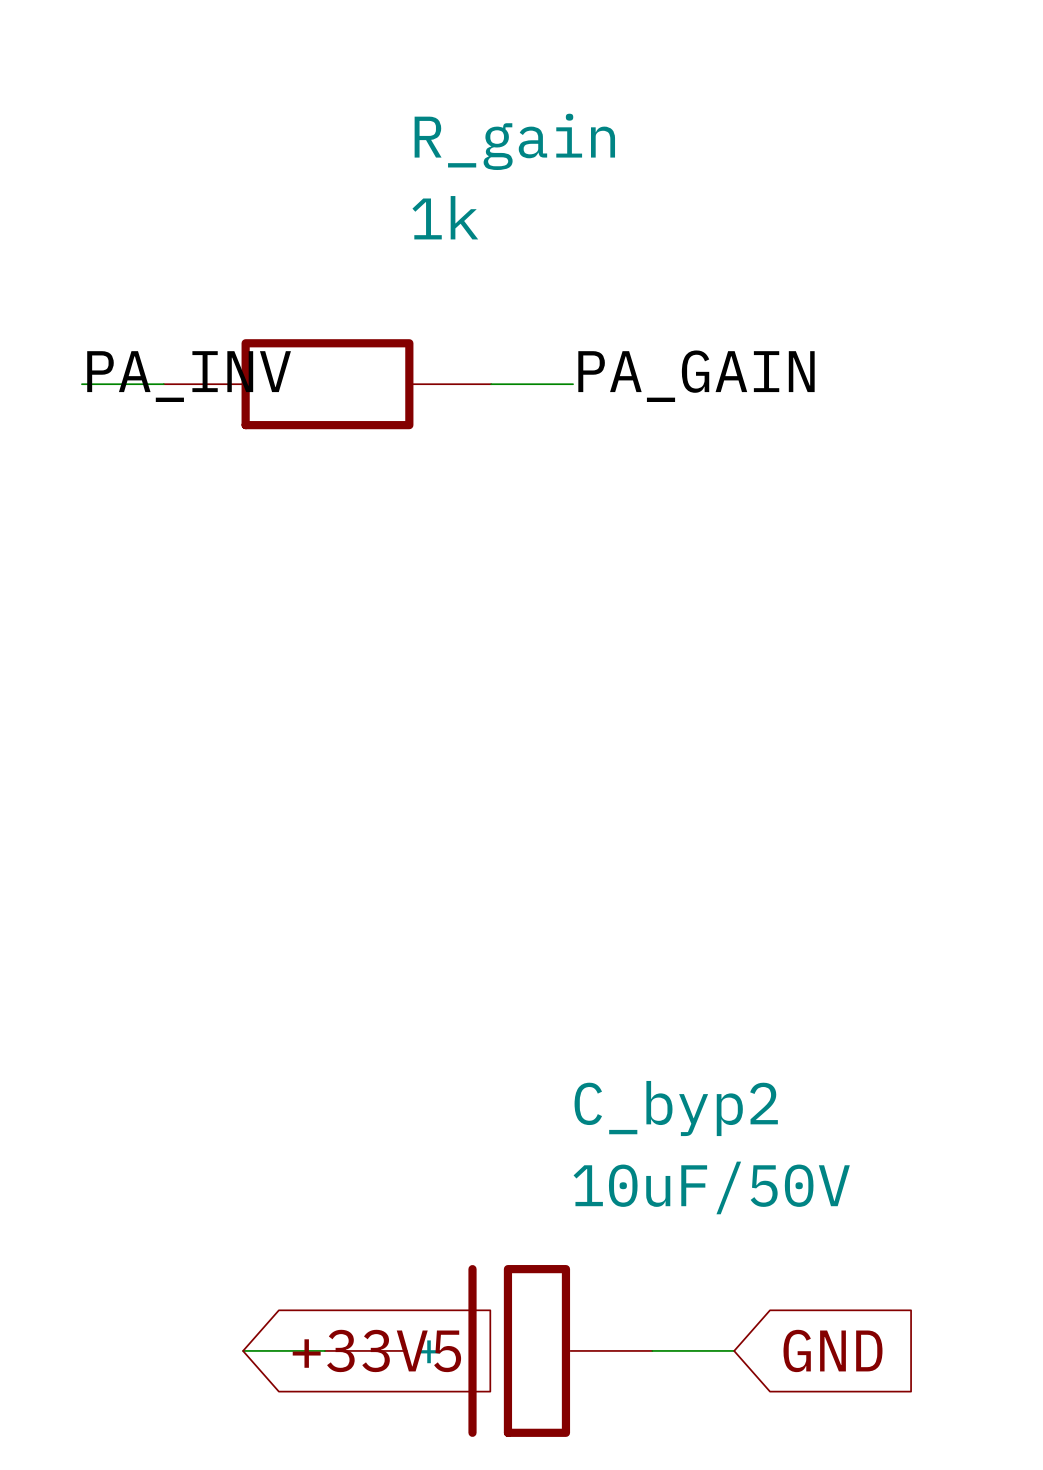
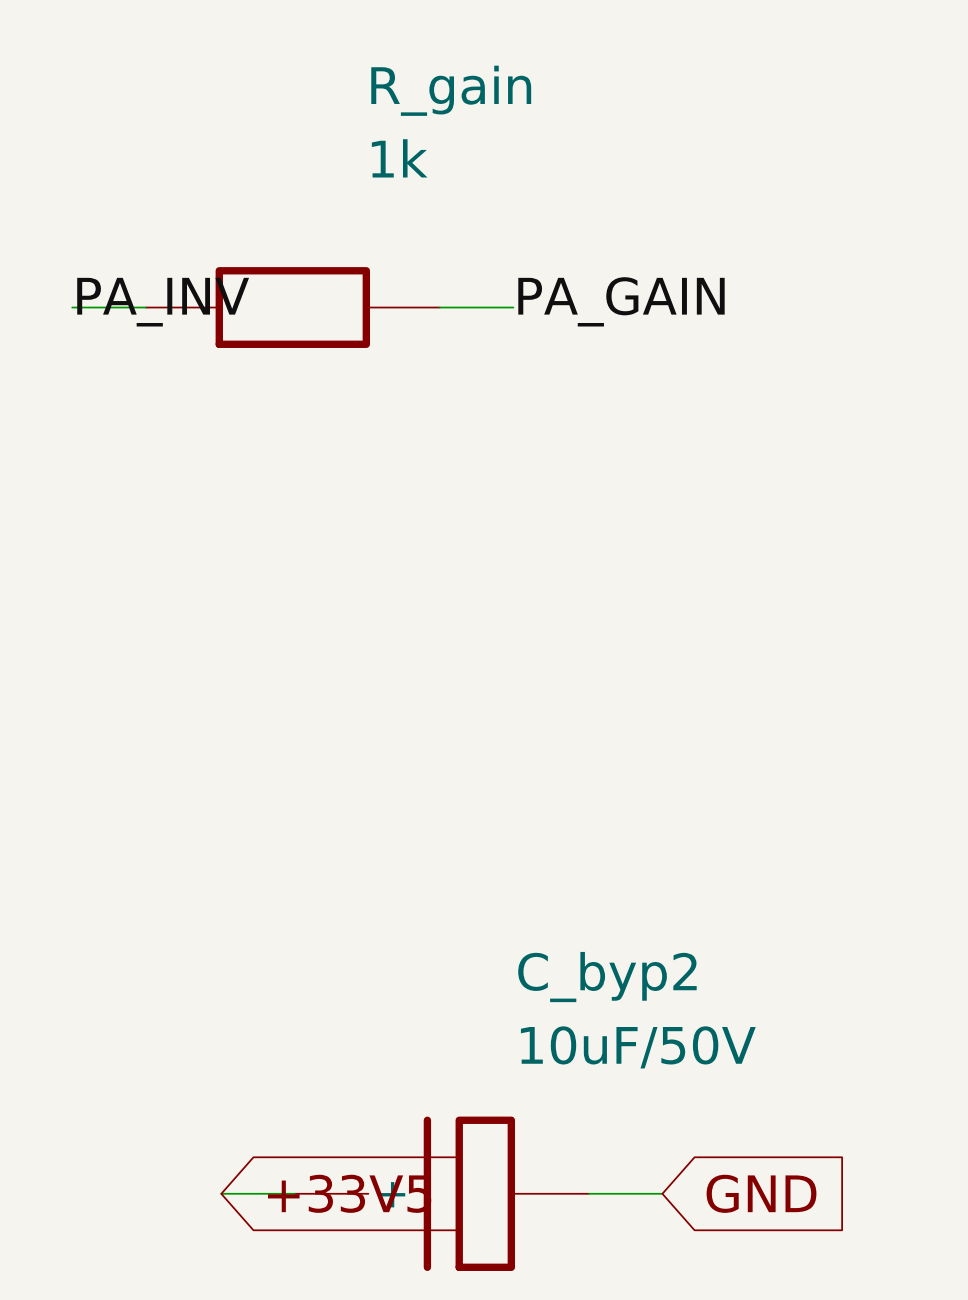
label position: PA_INV (189, 376) -> PA_INV (163, 302)
label position: PA_GAIN (696, 376) -> PA_GAIN (621, 301)
wire: (81, 384) (163, 384) -> (72, 307) (145, 307)
R_gain position: (327, 384) -> (292, 307)
wire: (491, 384) (573, 384) -> (439, 307) (513, 307)

